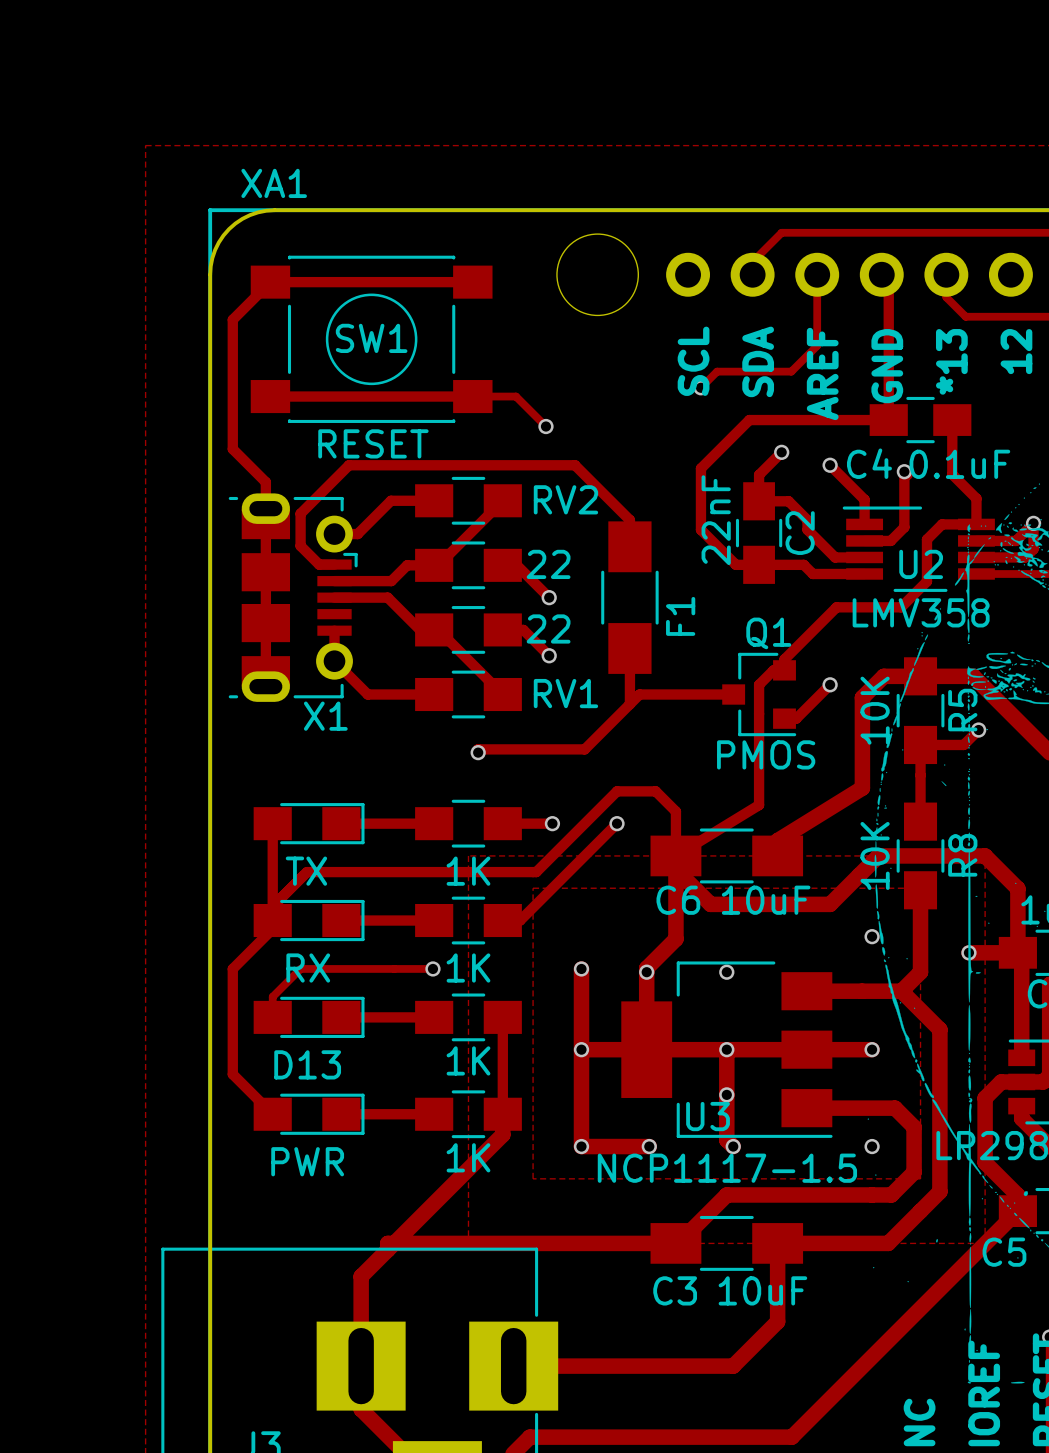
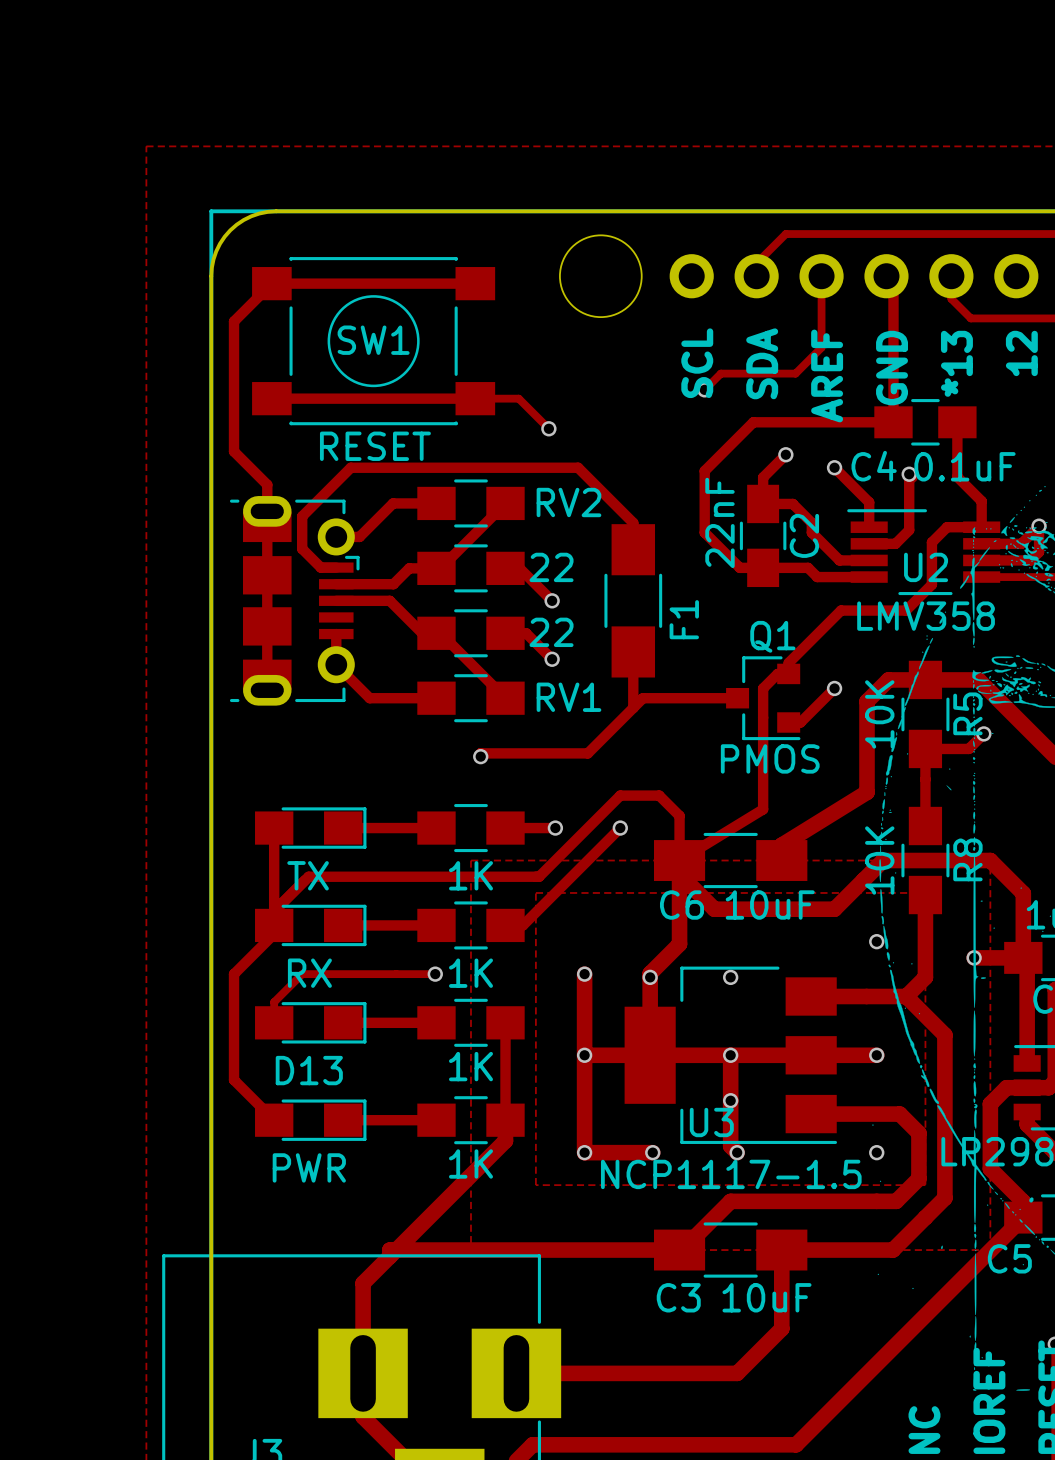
XA1 name: XA1 (274, 183) -> none
X1 name: X1 (325, 716) -> none

